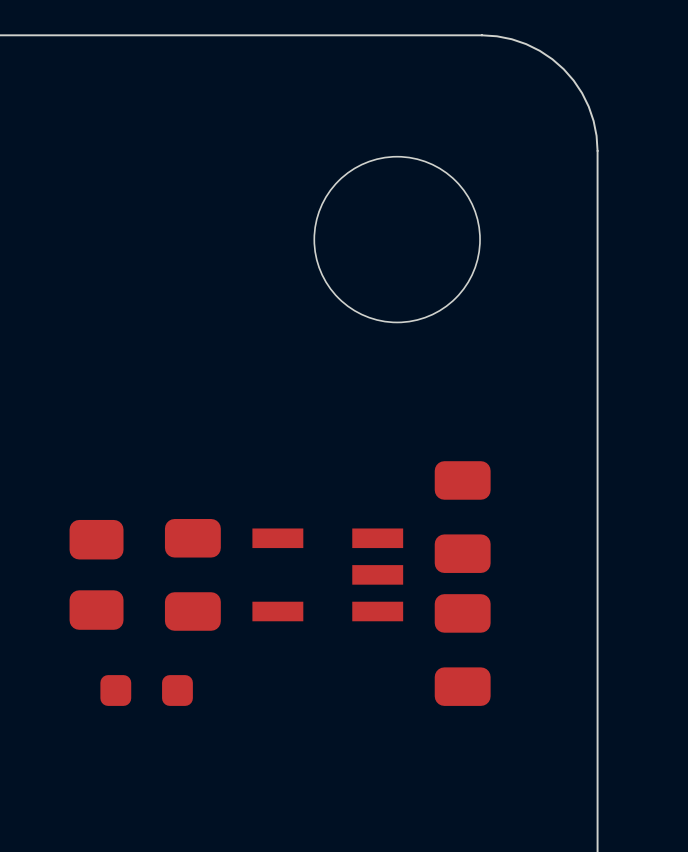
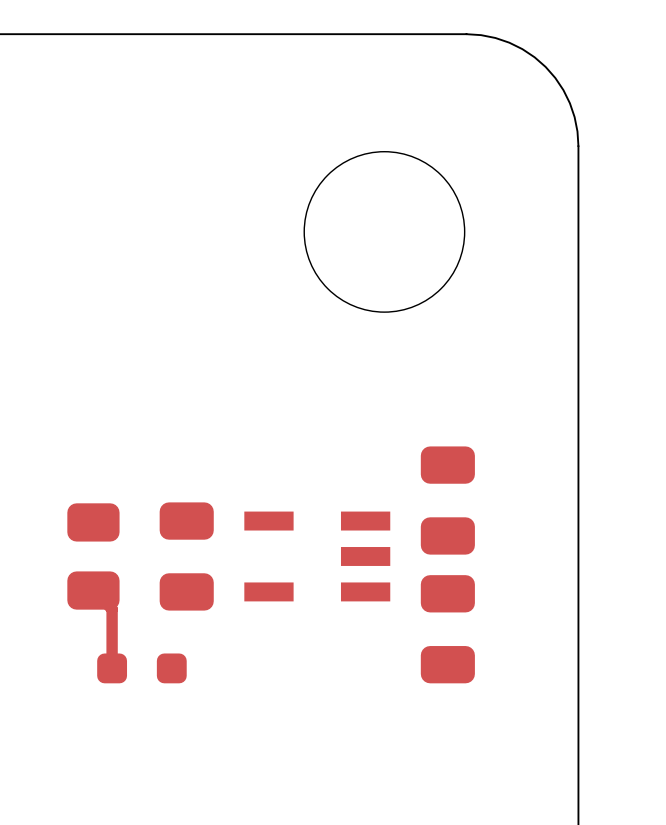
top track: none -> (93, 590) (112, 609) (112, 668)

